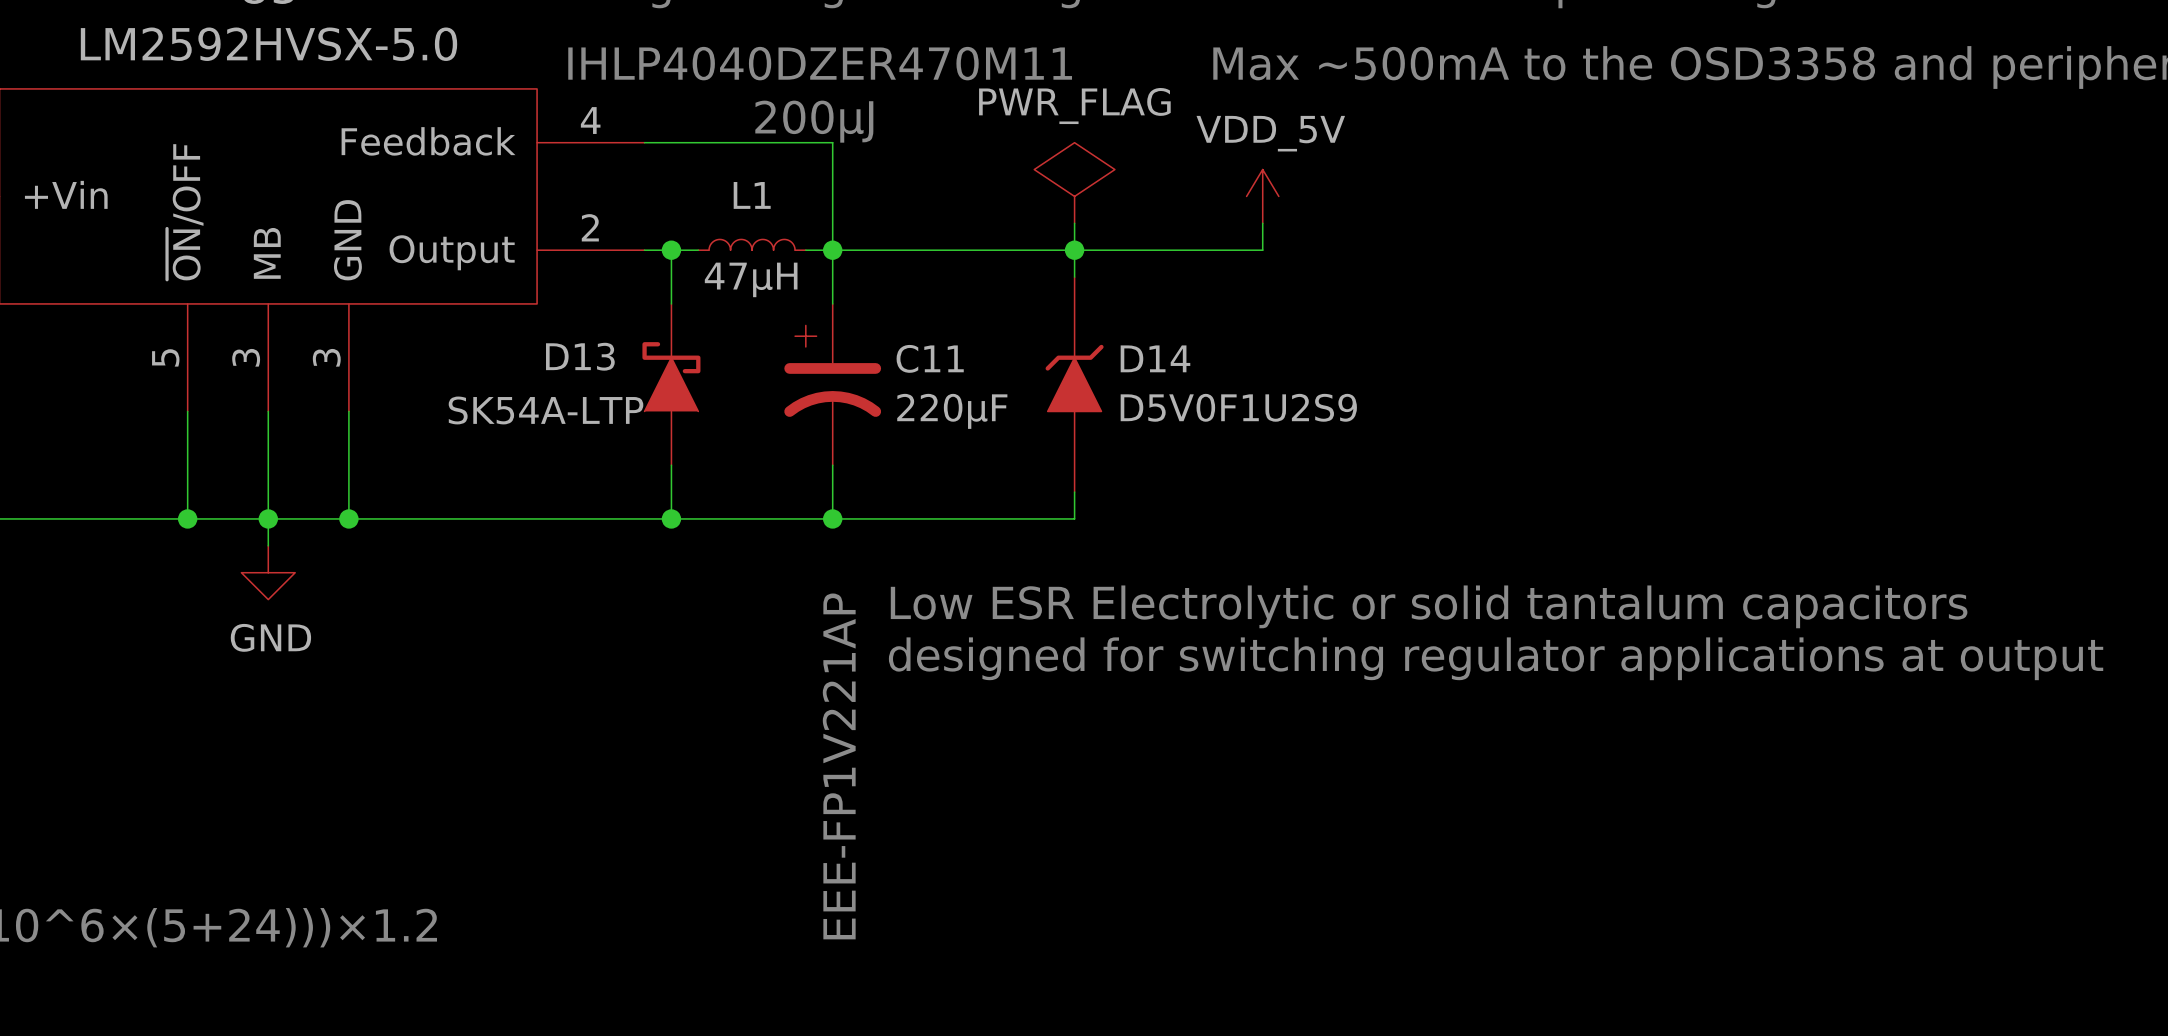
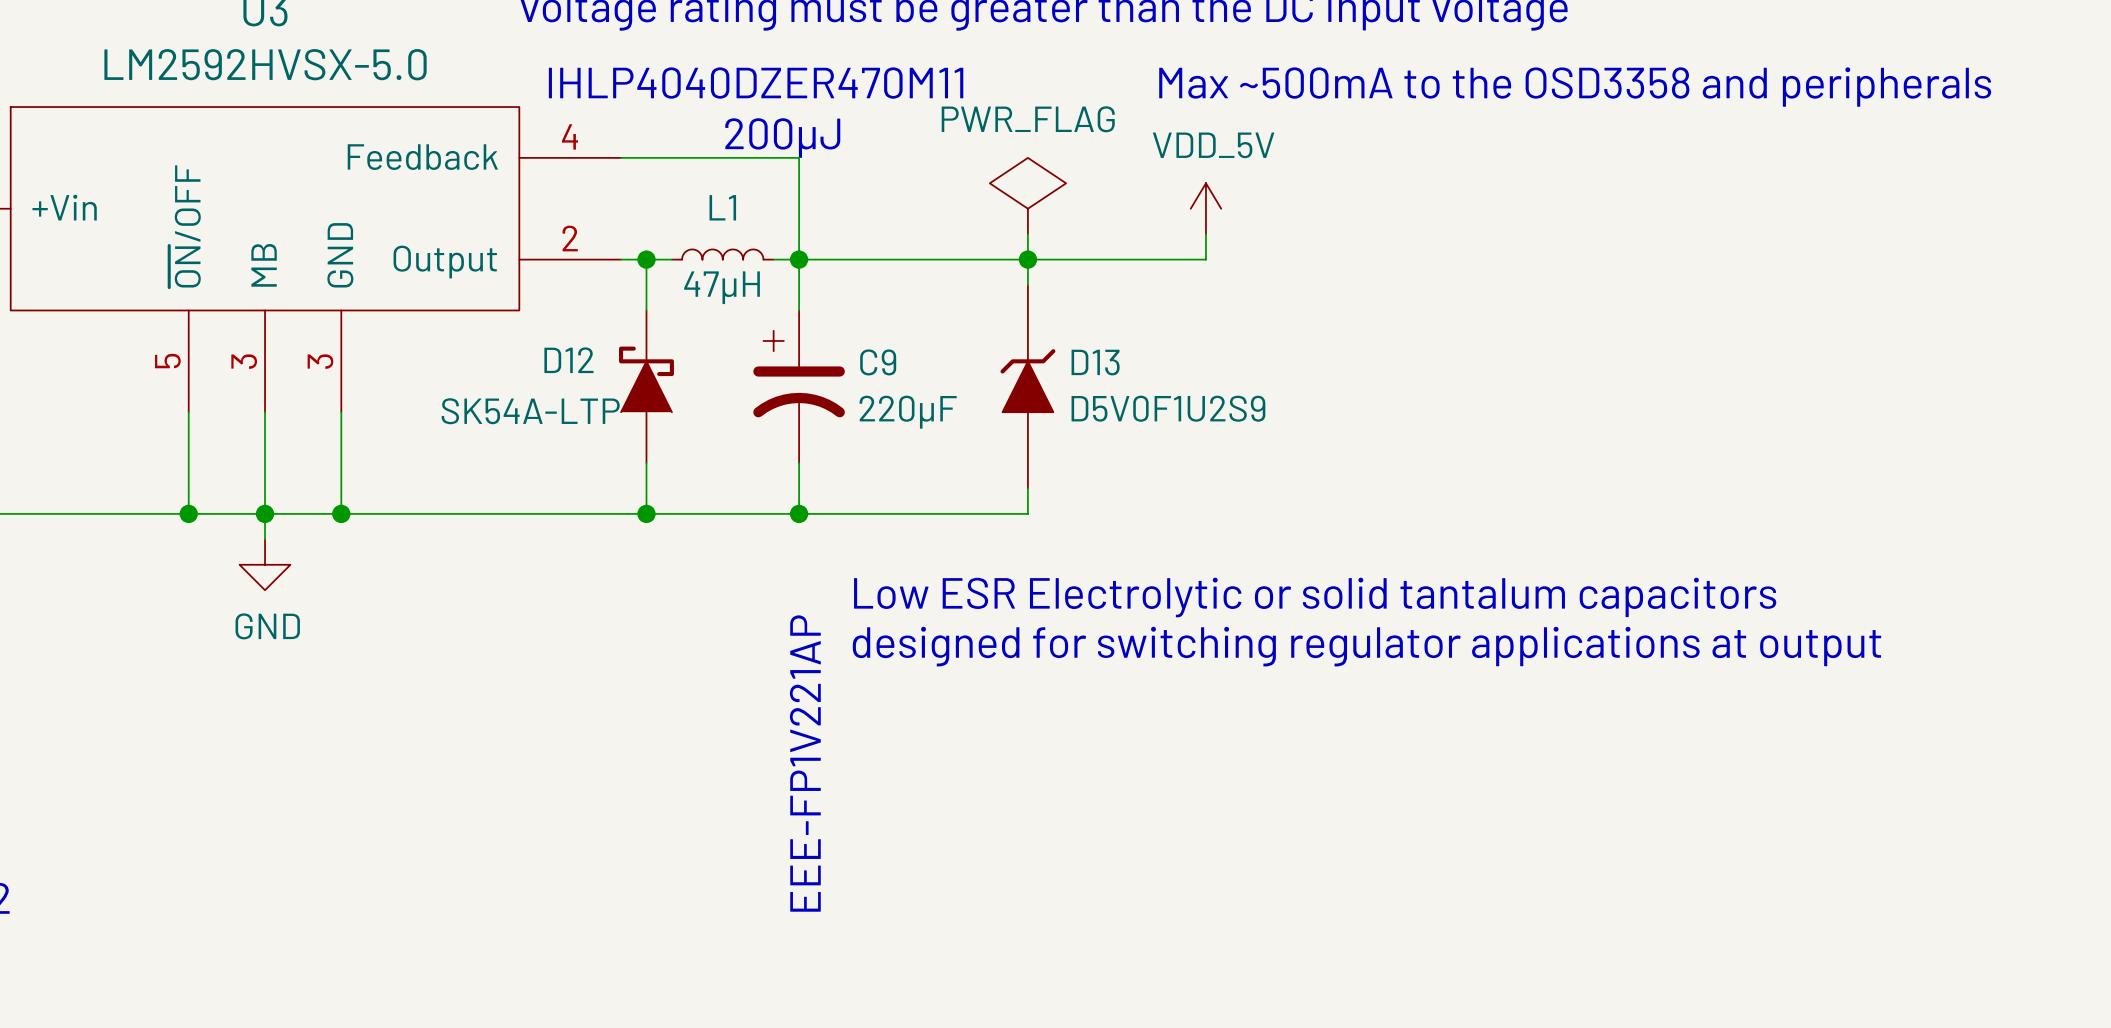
D13 name: D13 (580, 356) -> D12 (568, 360)
C11 name: C11 (930, 358) -> C9 (878, 362)
D14 name: D14 (1155, 358) -> D13 (1095, 362)

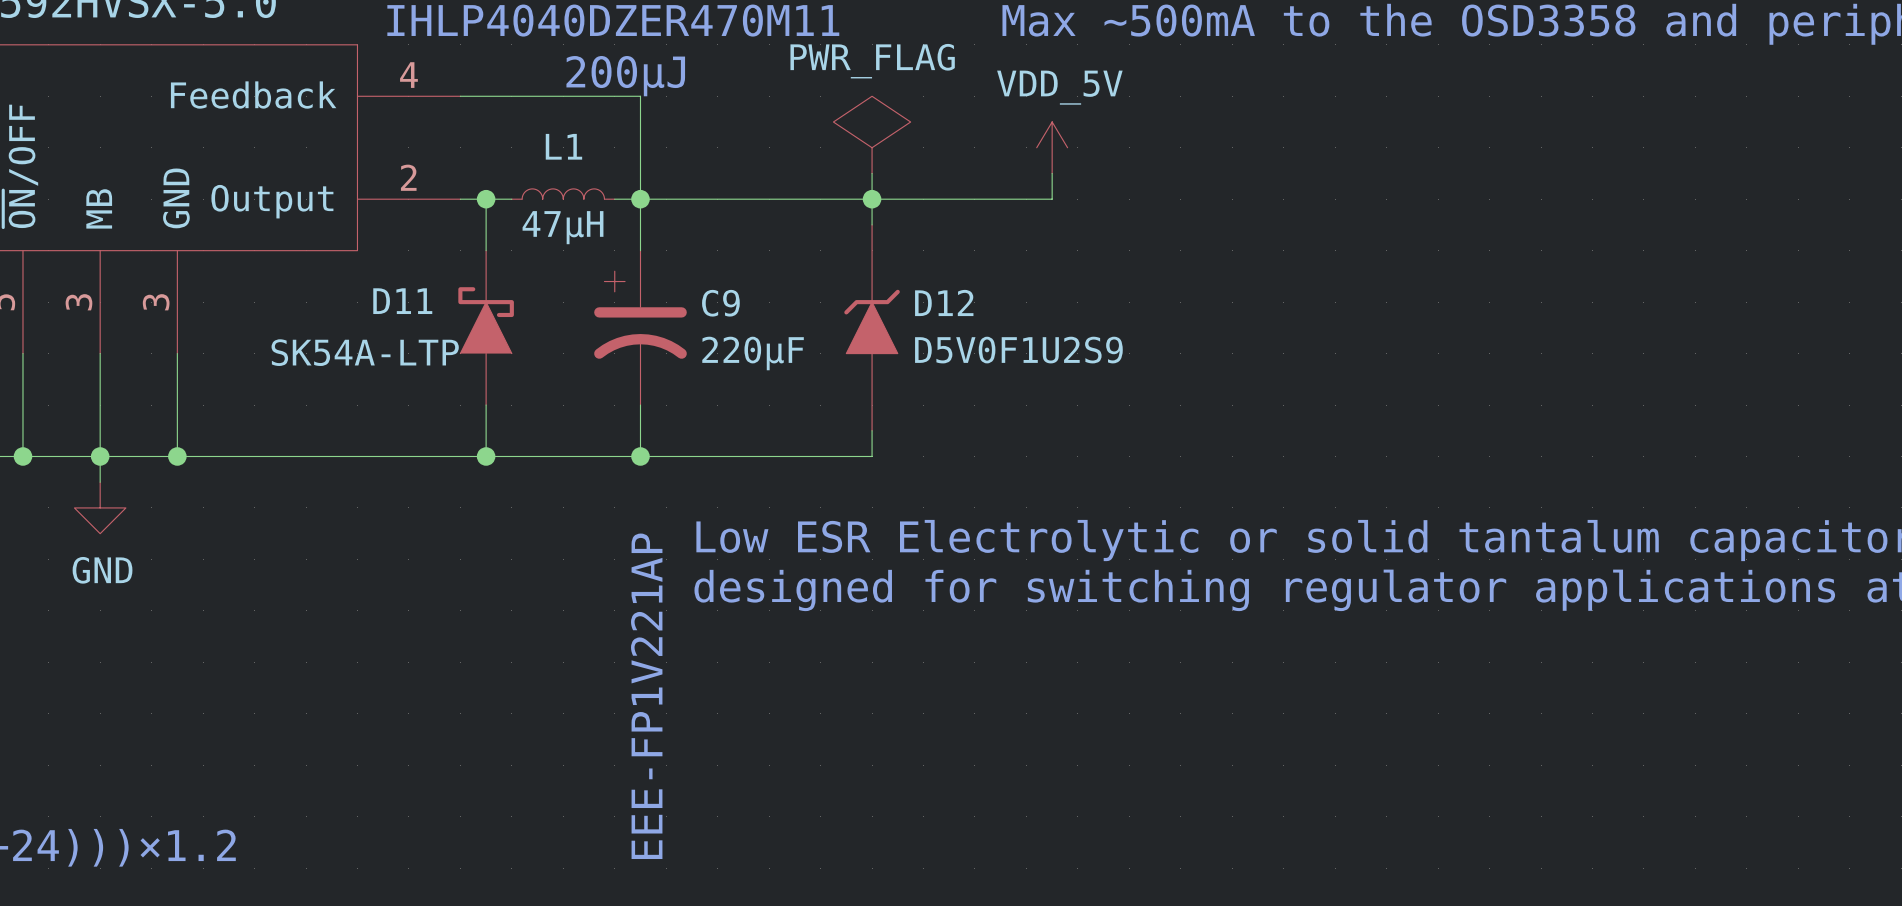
D12 name: D12 (568, 360) -> D11 (402, 301)
D13 name: D13 (1095, 362) -> D12 (944, 302)

